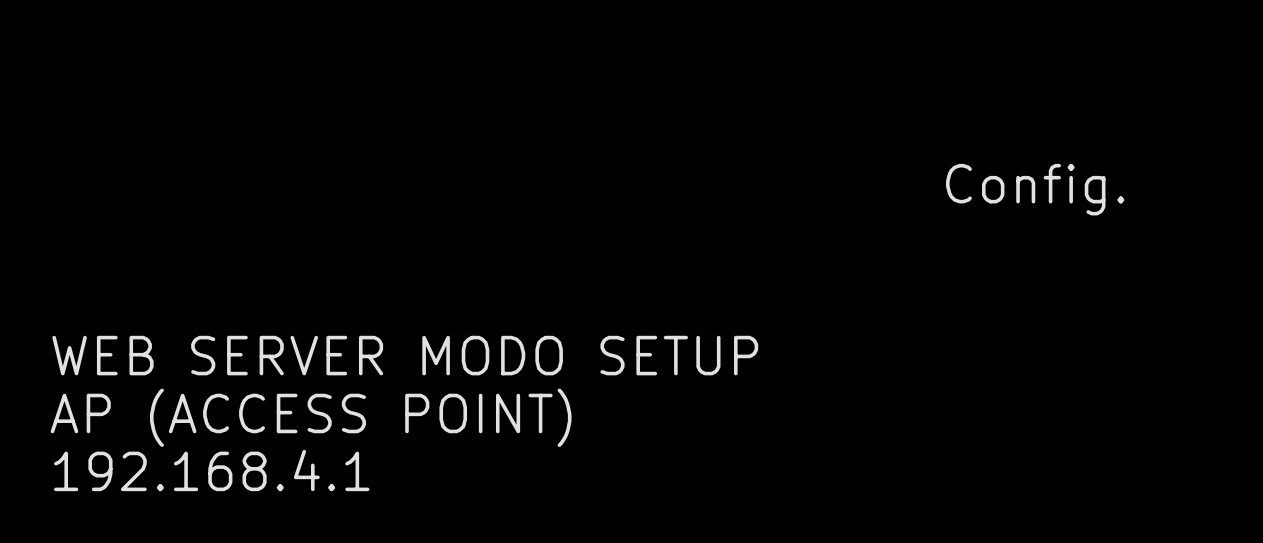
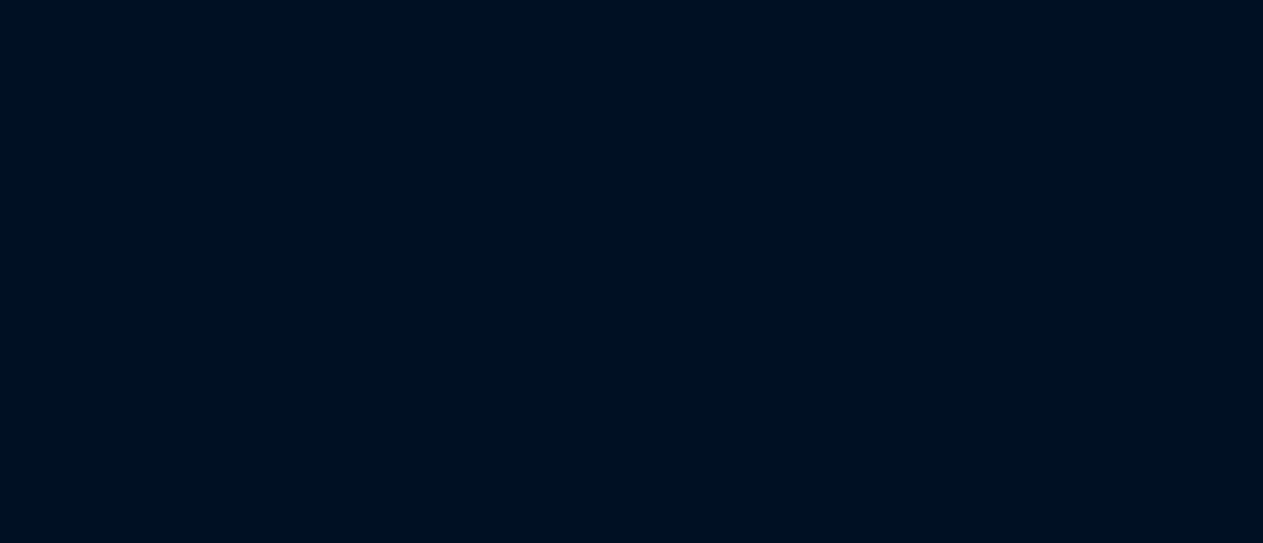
text: Config. (1035, 189) -> none
text: WEB SERVER MODO SETUP (405, 355) -> none
text: AP (ACCESS POINT) (311, 417) -> none
text: 192.168.4.1 (211, 470) -> none

